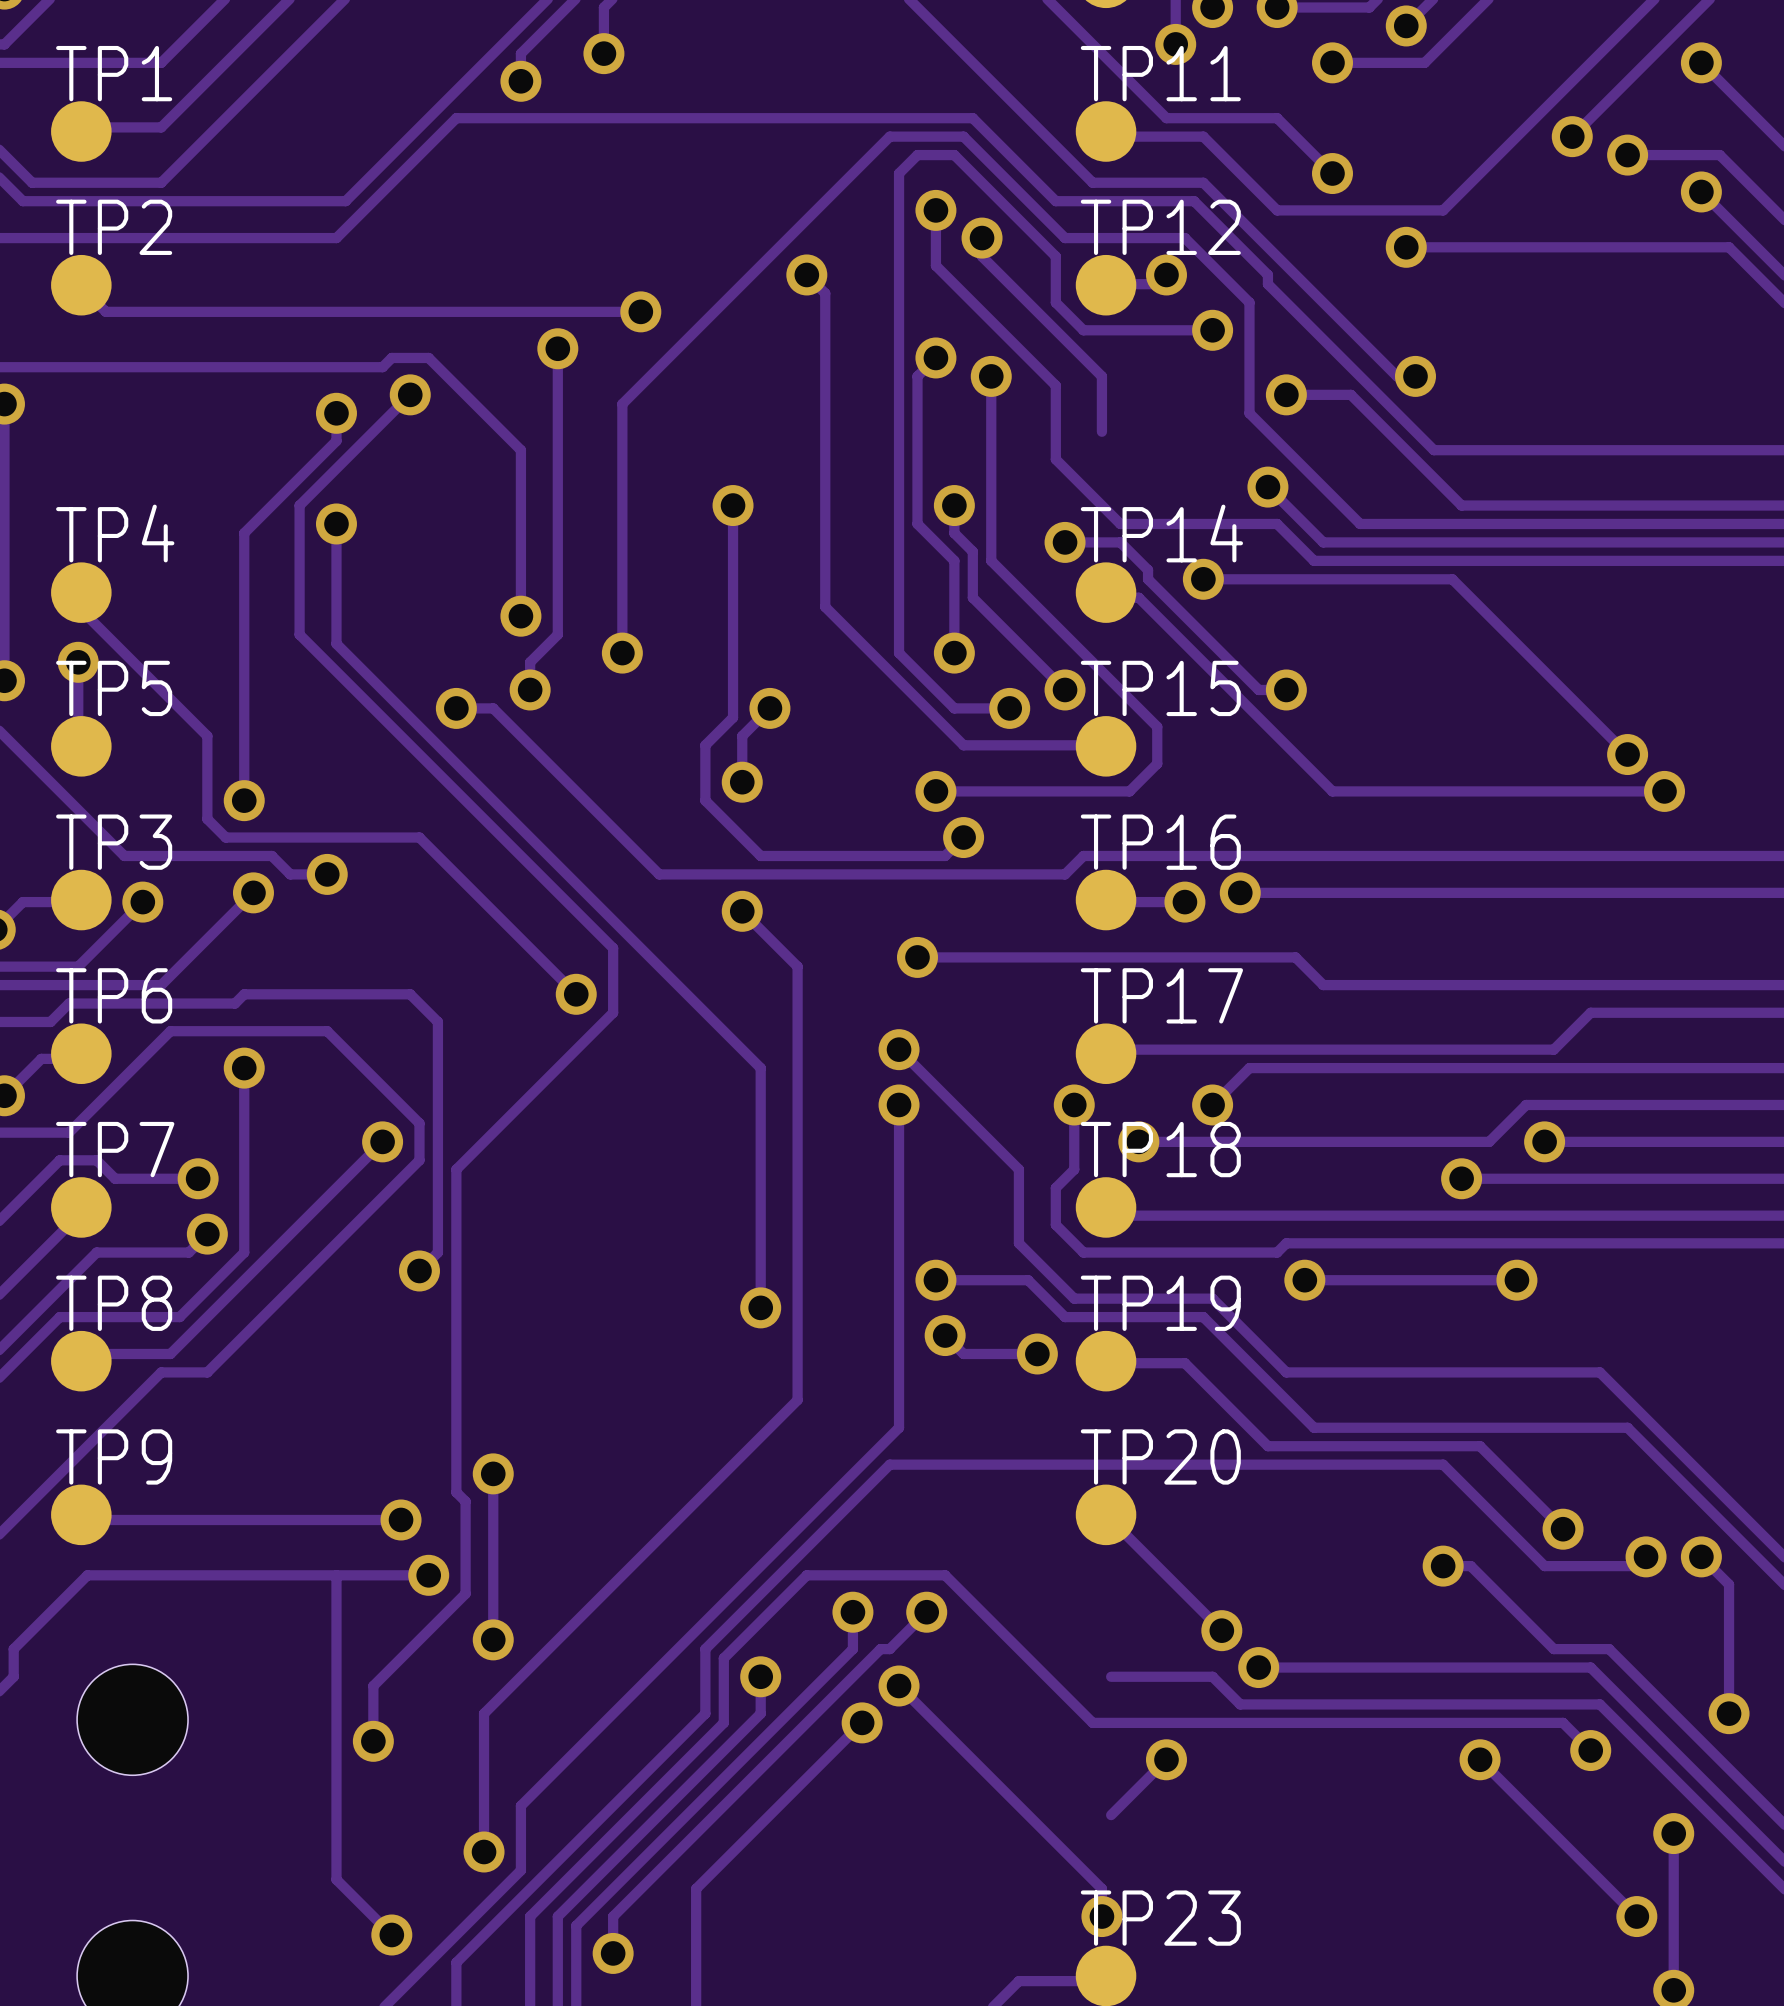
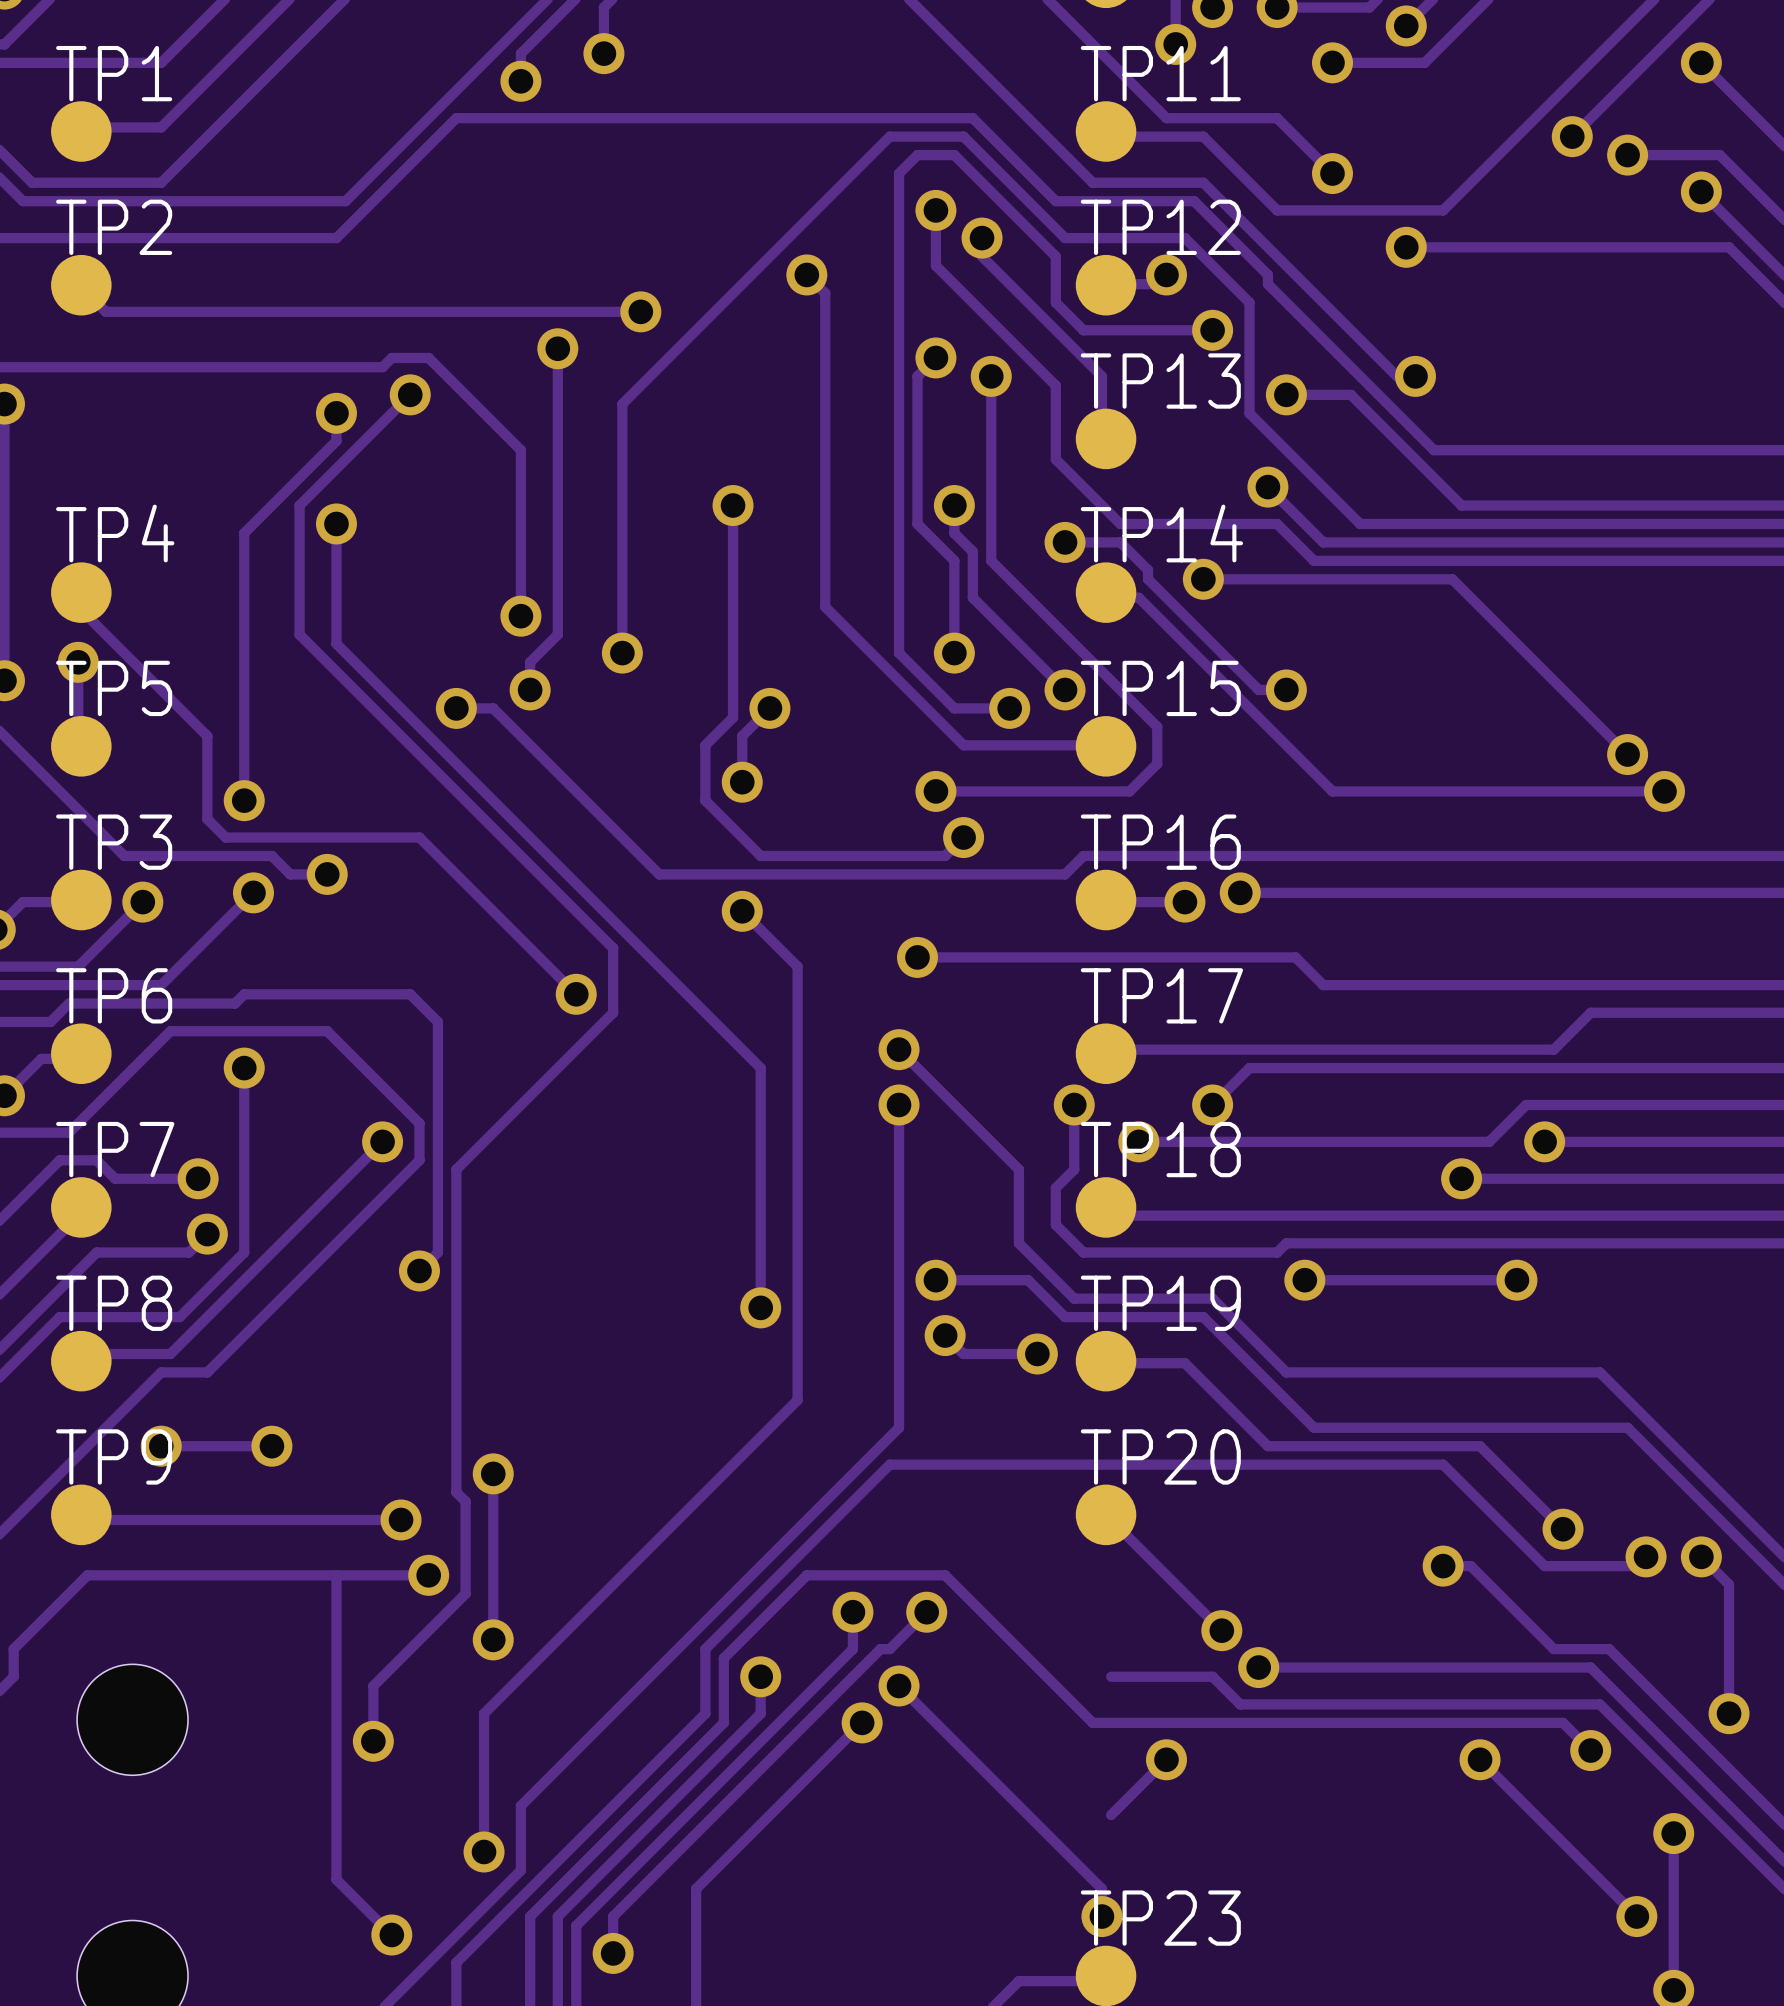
TP13: none -> (1106, 438)
track: none -> (161, 1446) (271, 1446)
via: none -> (161, 1446)
via: none -> (271, 1446)

